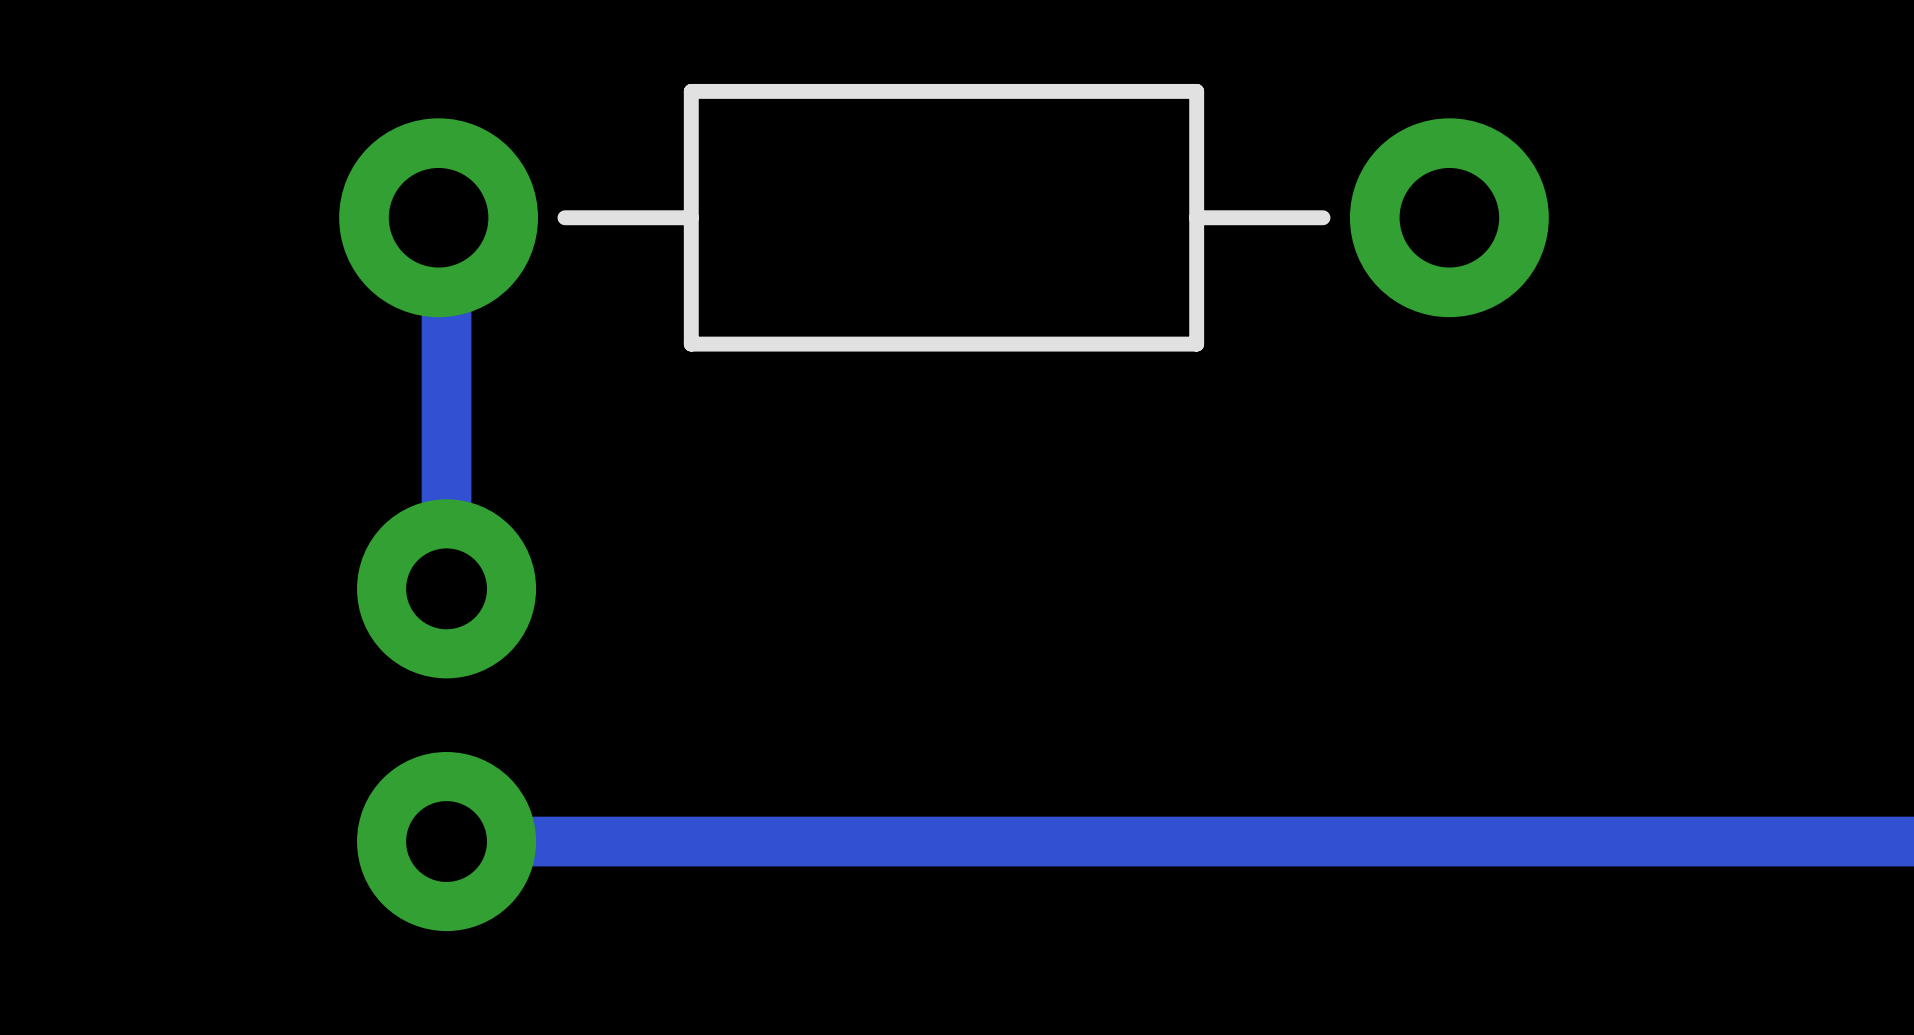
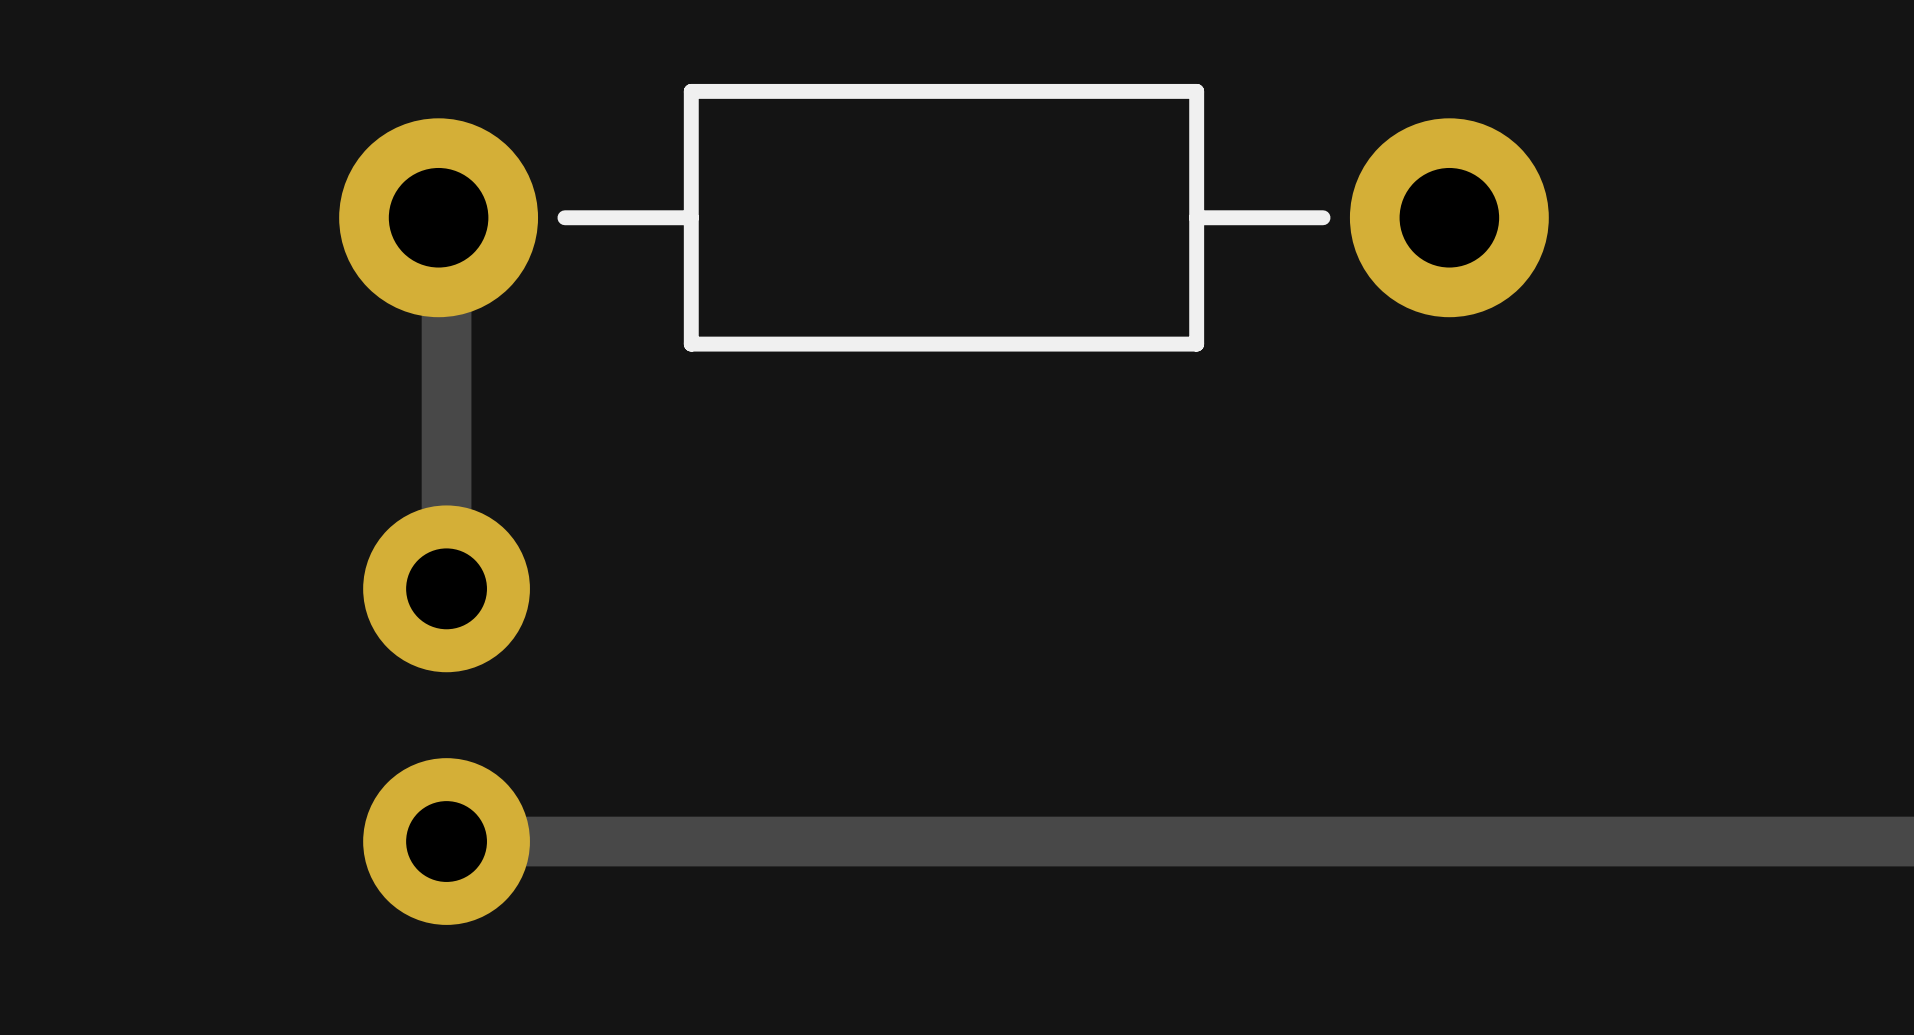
part footprint: [357, 499, 537, 932] -> [363, 505, 530, 925]

